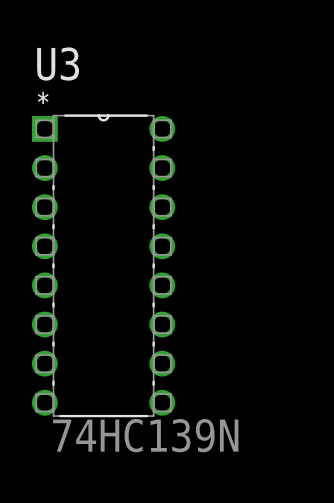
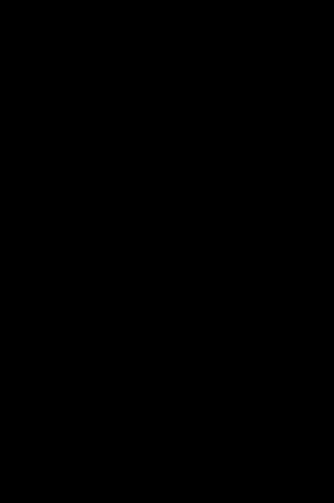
U3: 74HC139N (103, 265) -> none

